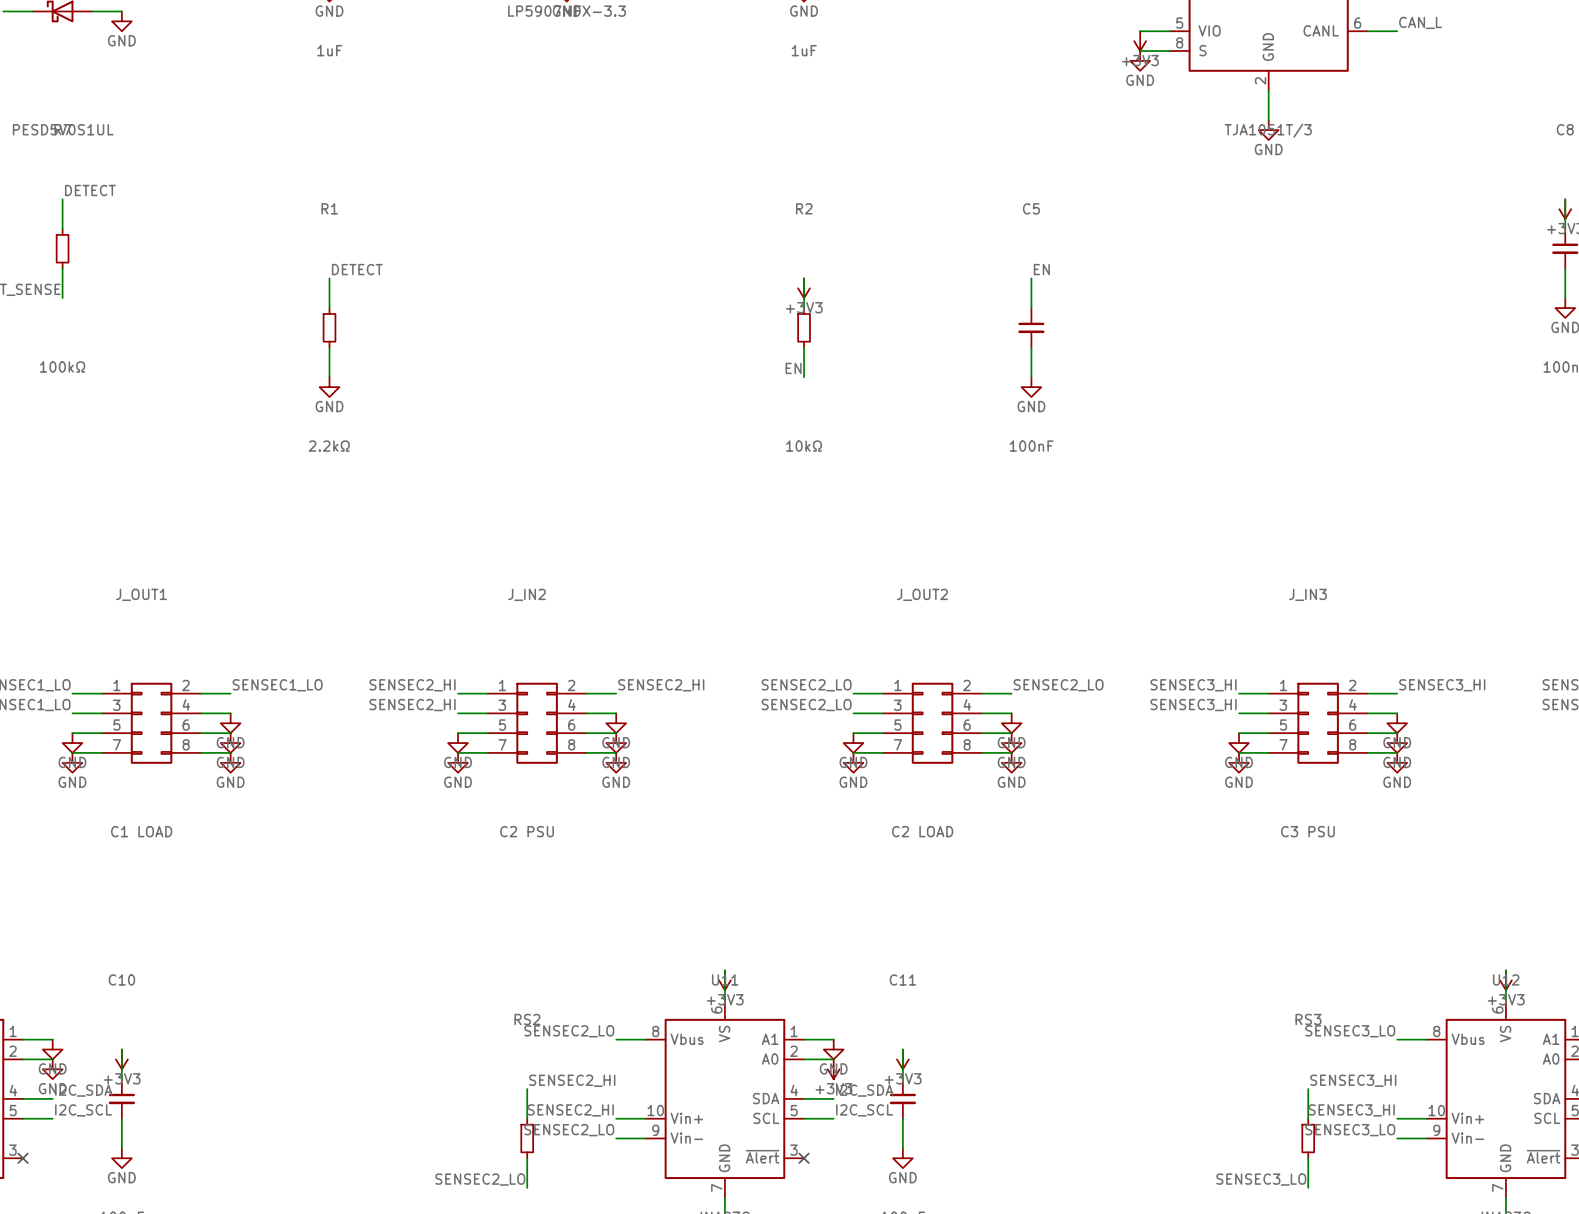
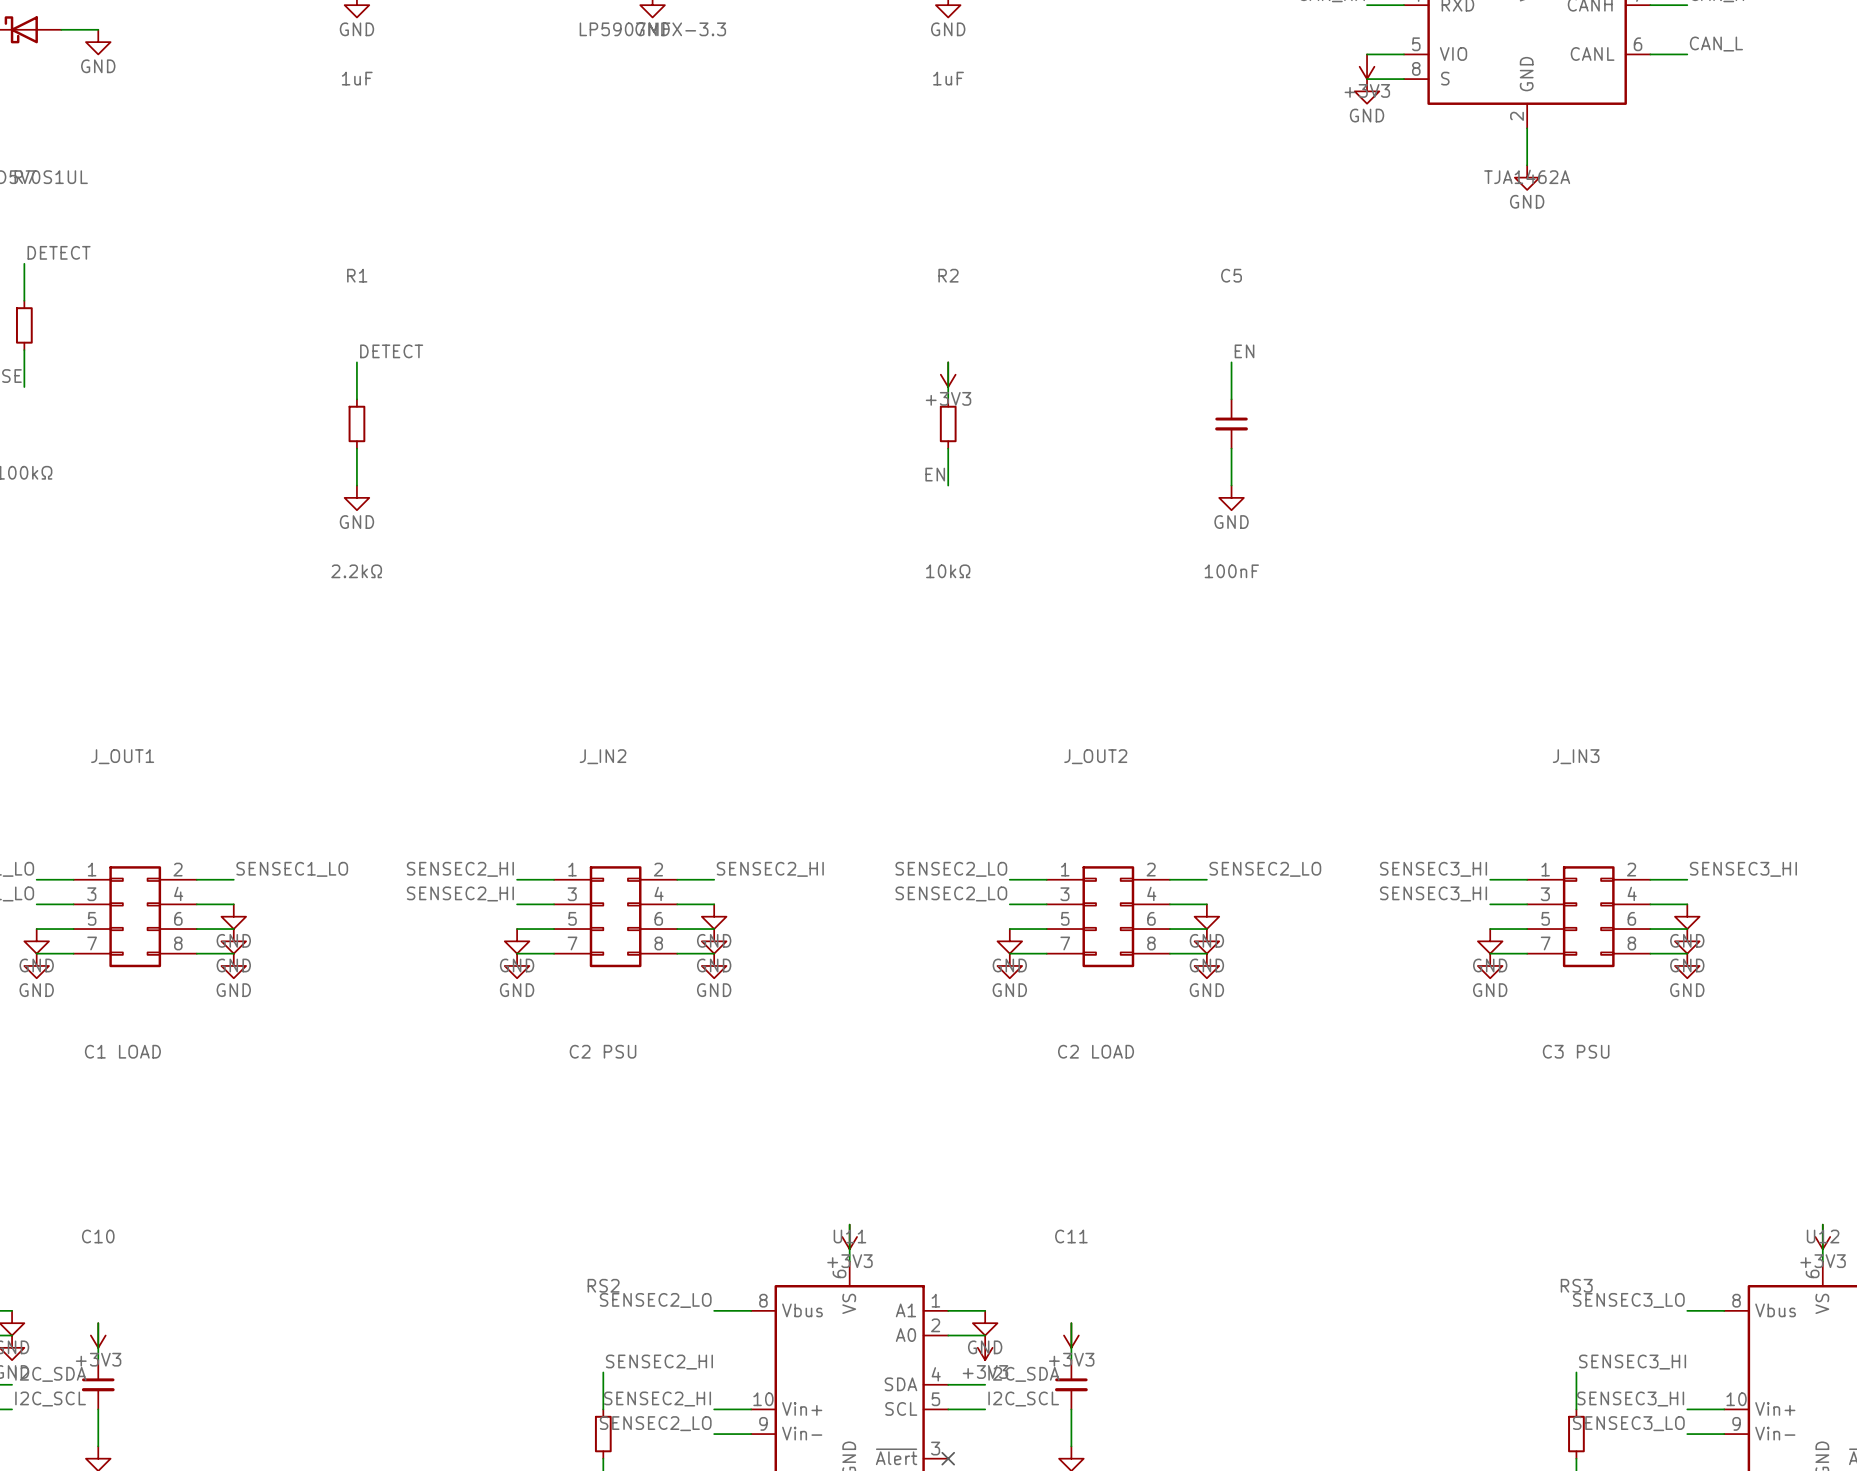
part value: TJA1051T/3 (1268, 130) -> TJA1462A (1527, 176)

